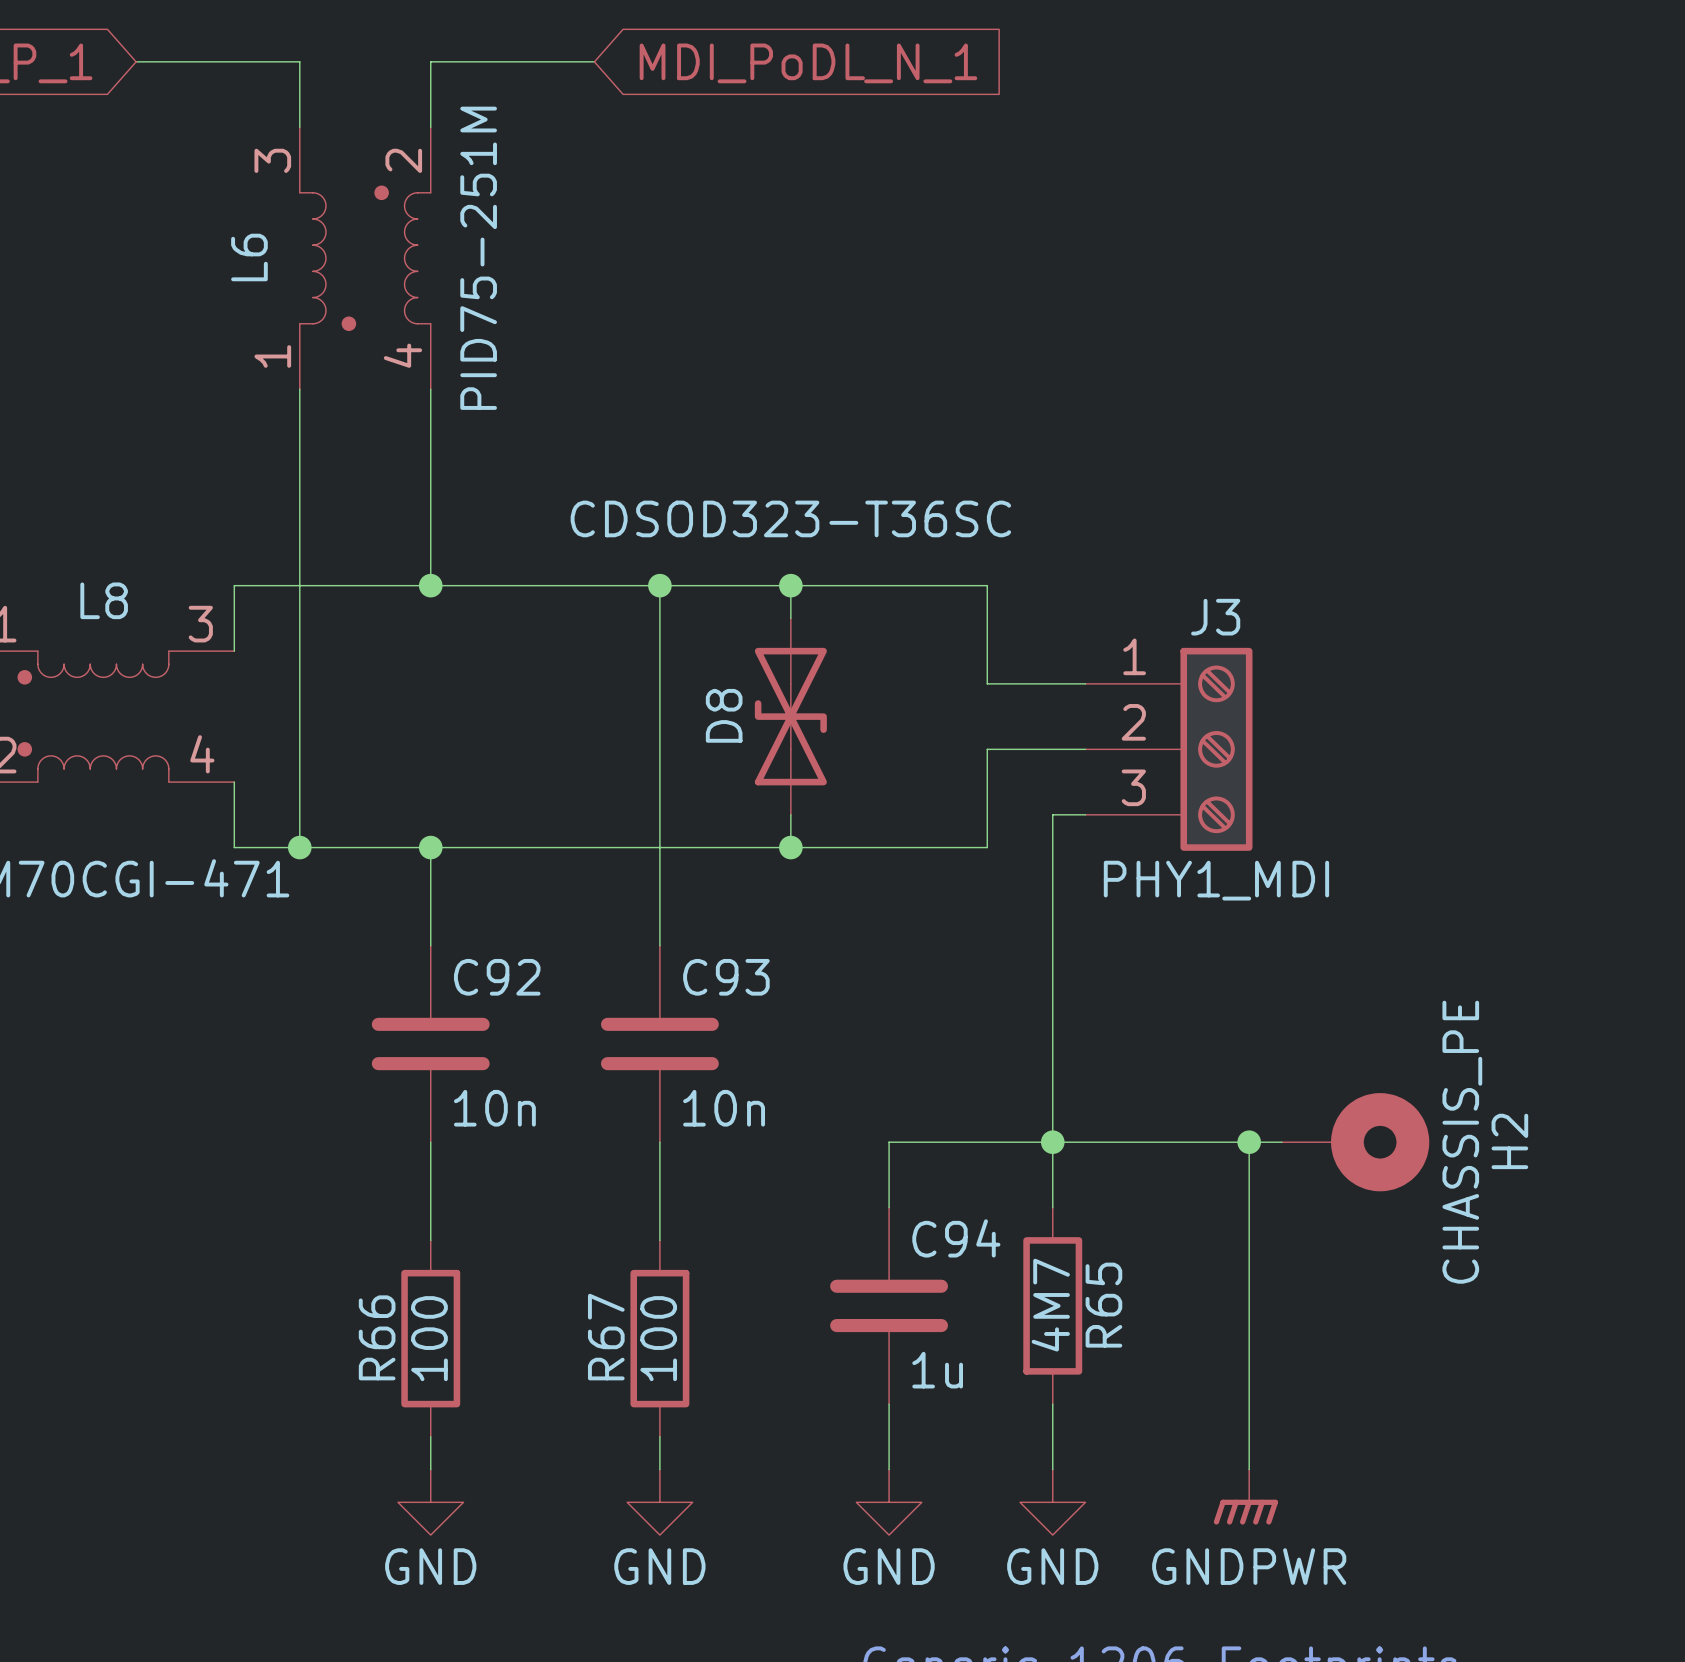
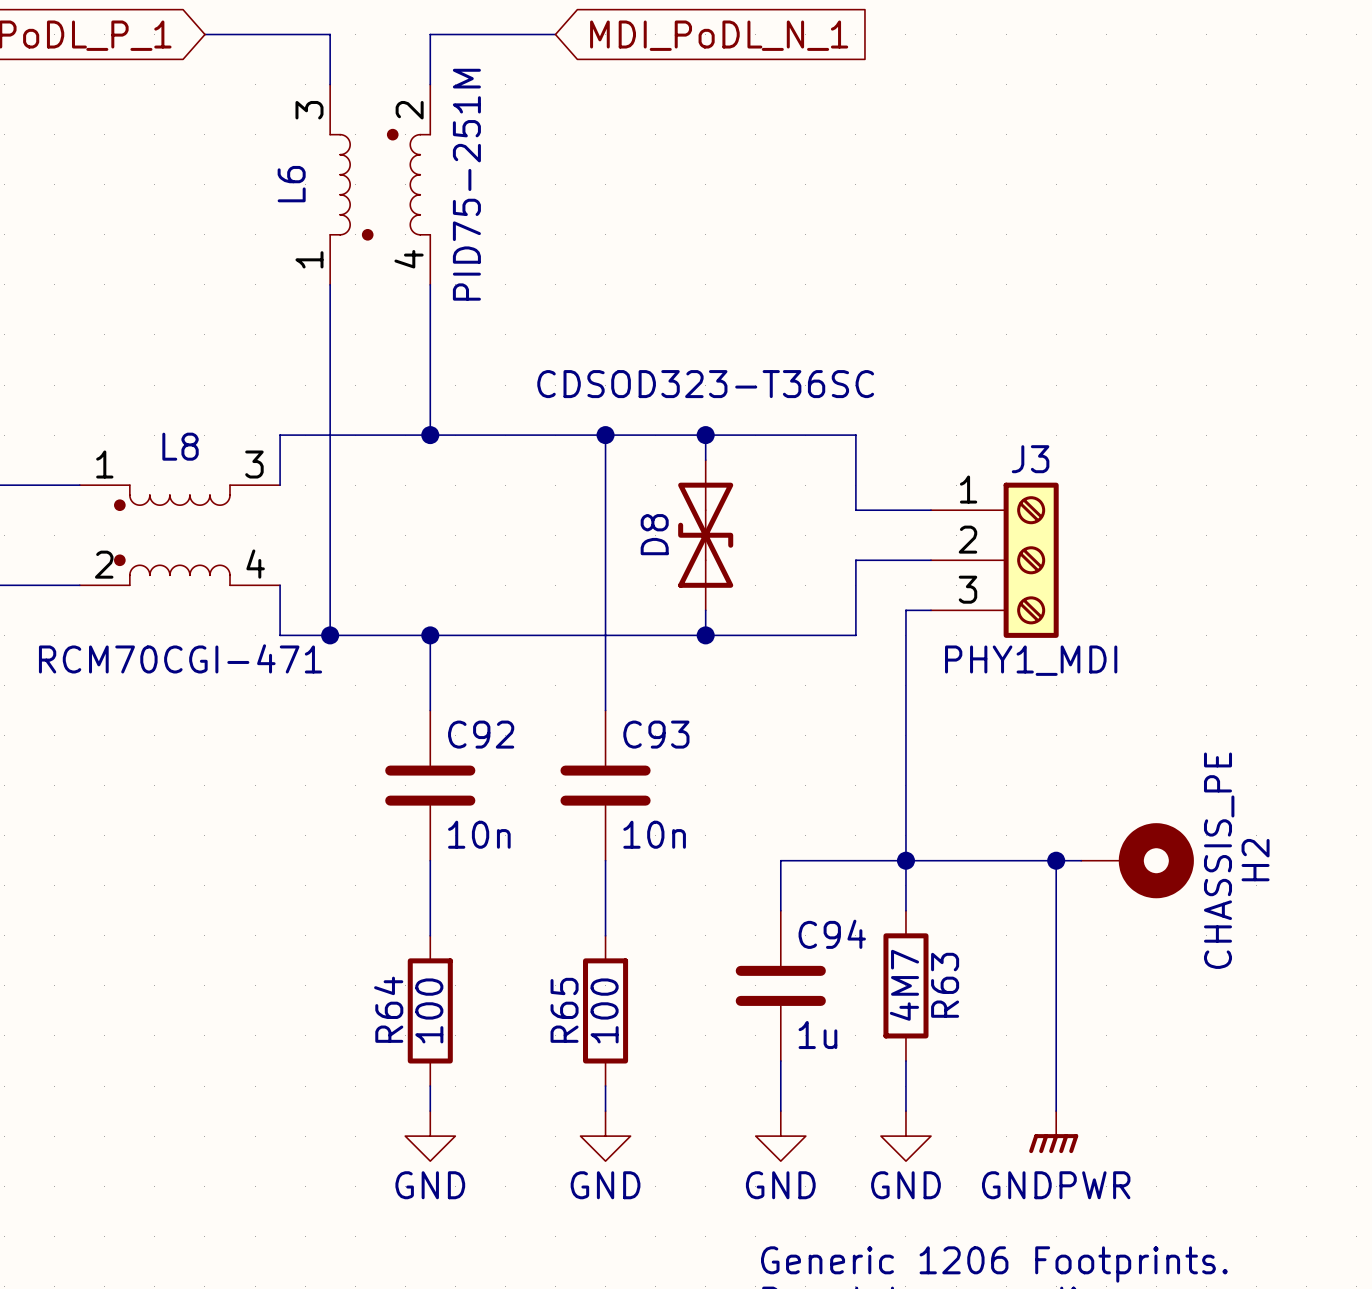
R65 name: R65 (1103, 1305) -> R63 (945, 985)
R66 name: R66 (377, 1337) -> R64 (388, 1009)
R67 name: R67 (606, 1337) -> R65 (564, 1010)

